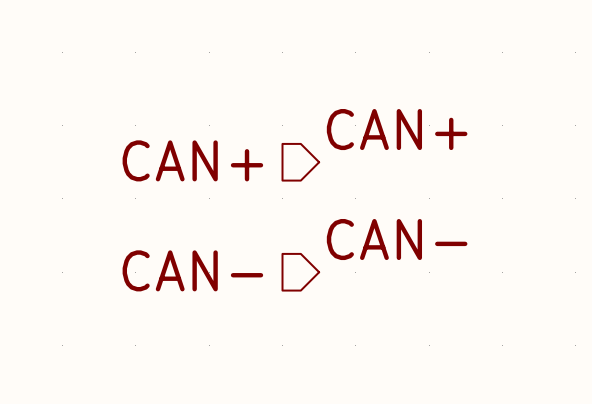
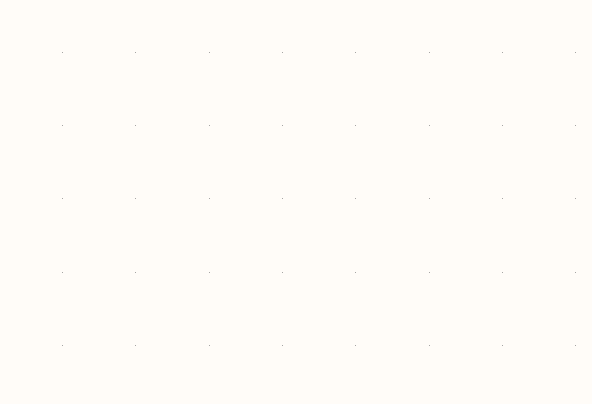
label: CAN+ (397, 129) -> none
hierarchical label: CAN+ (192, 160) -> none
label: CAN- (397, 239) -> none
hierarchical label: CAN- (192, 270) -> none

